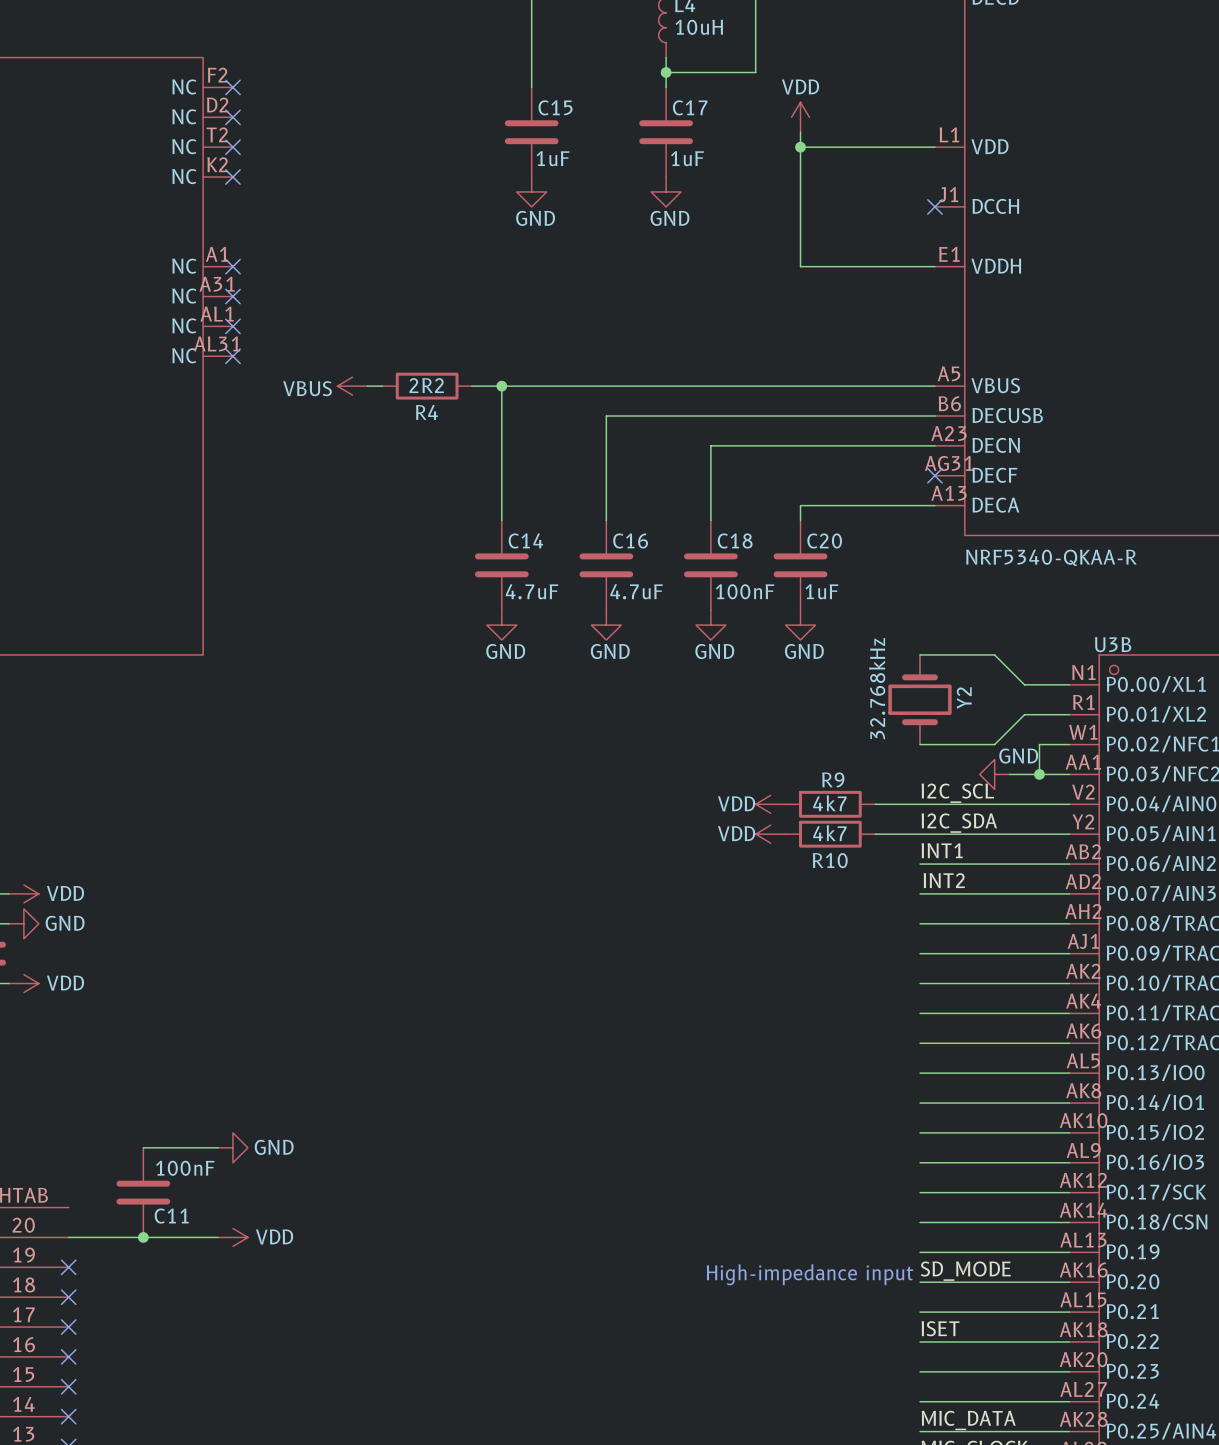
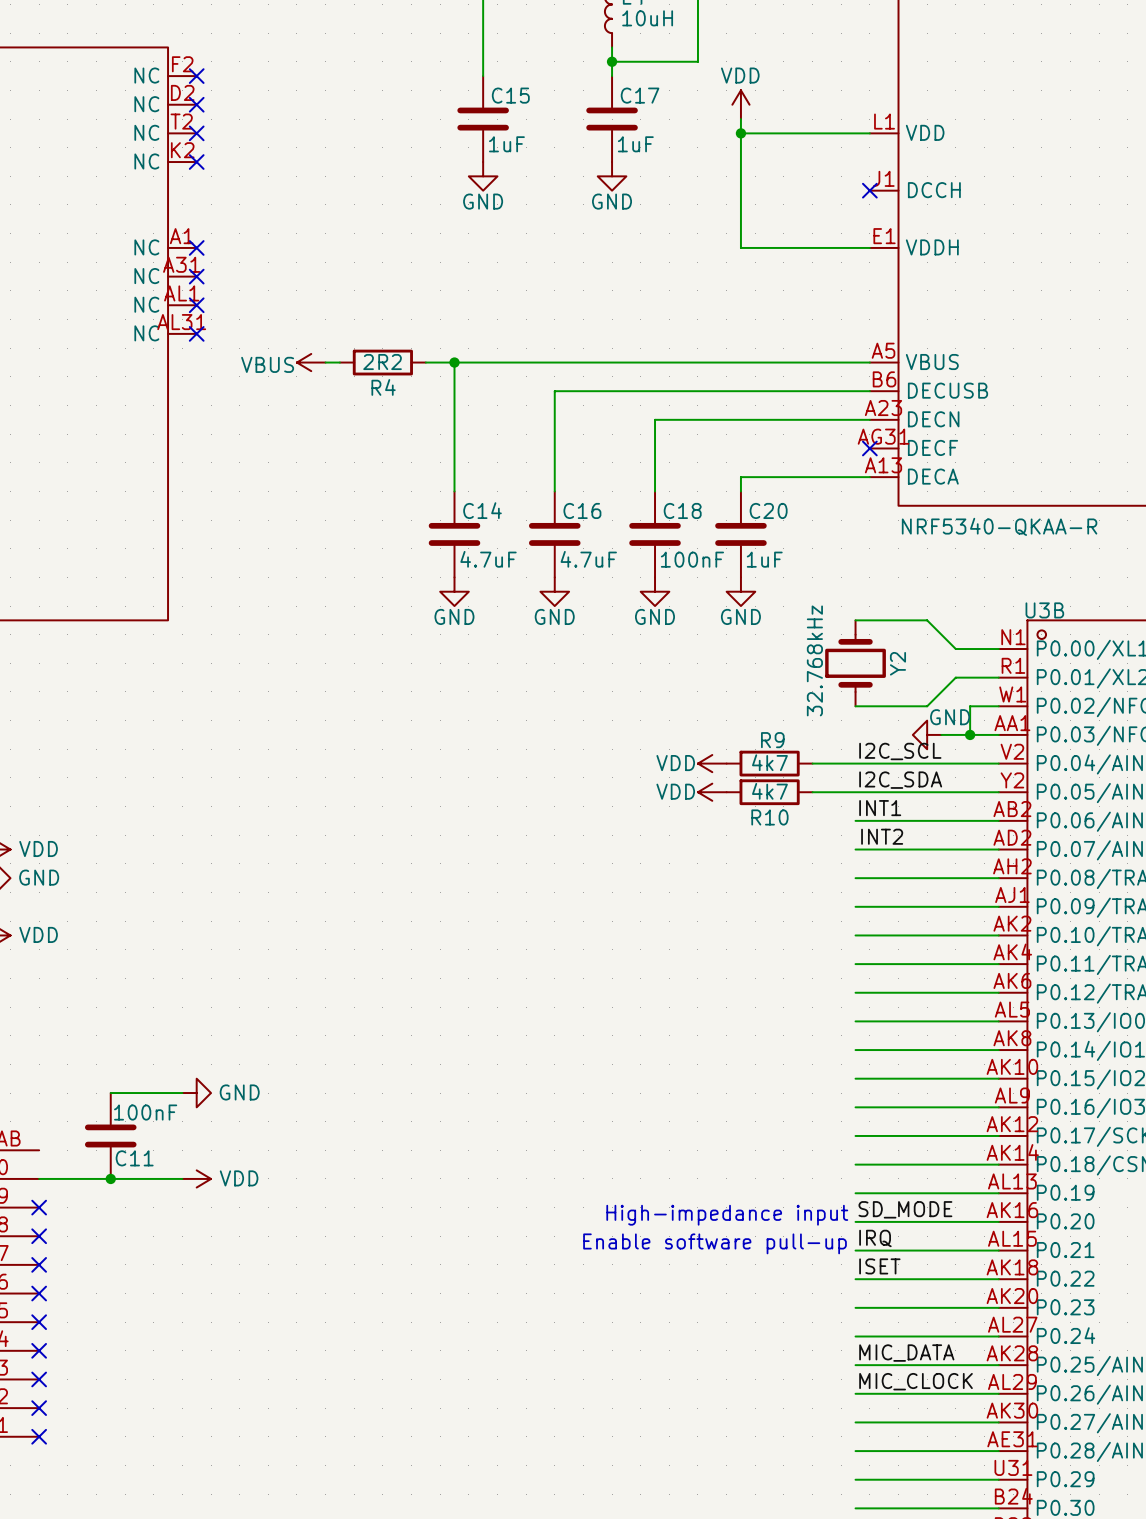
label: none -> IRQ (875, 1238)
text: none -> Enable software pull-up (715, 1243)

